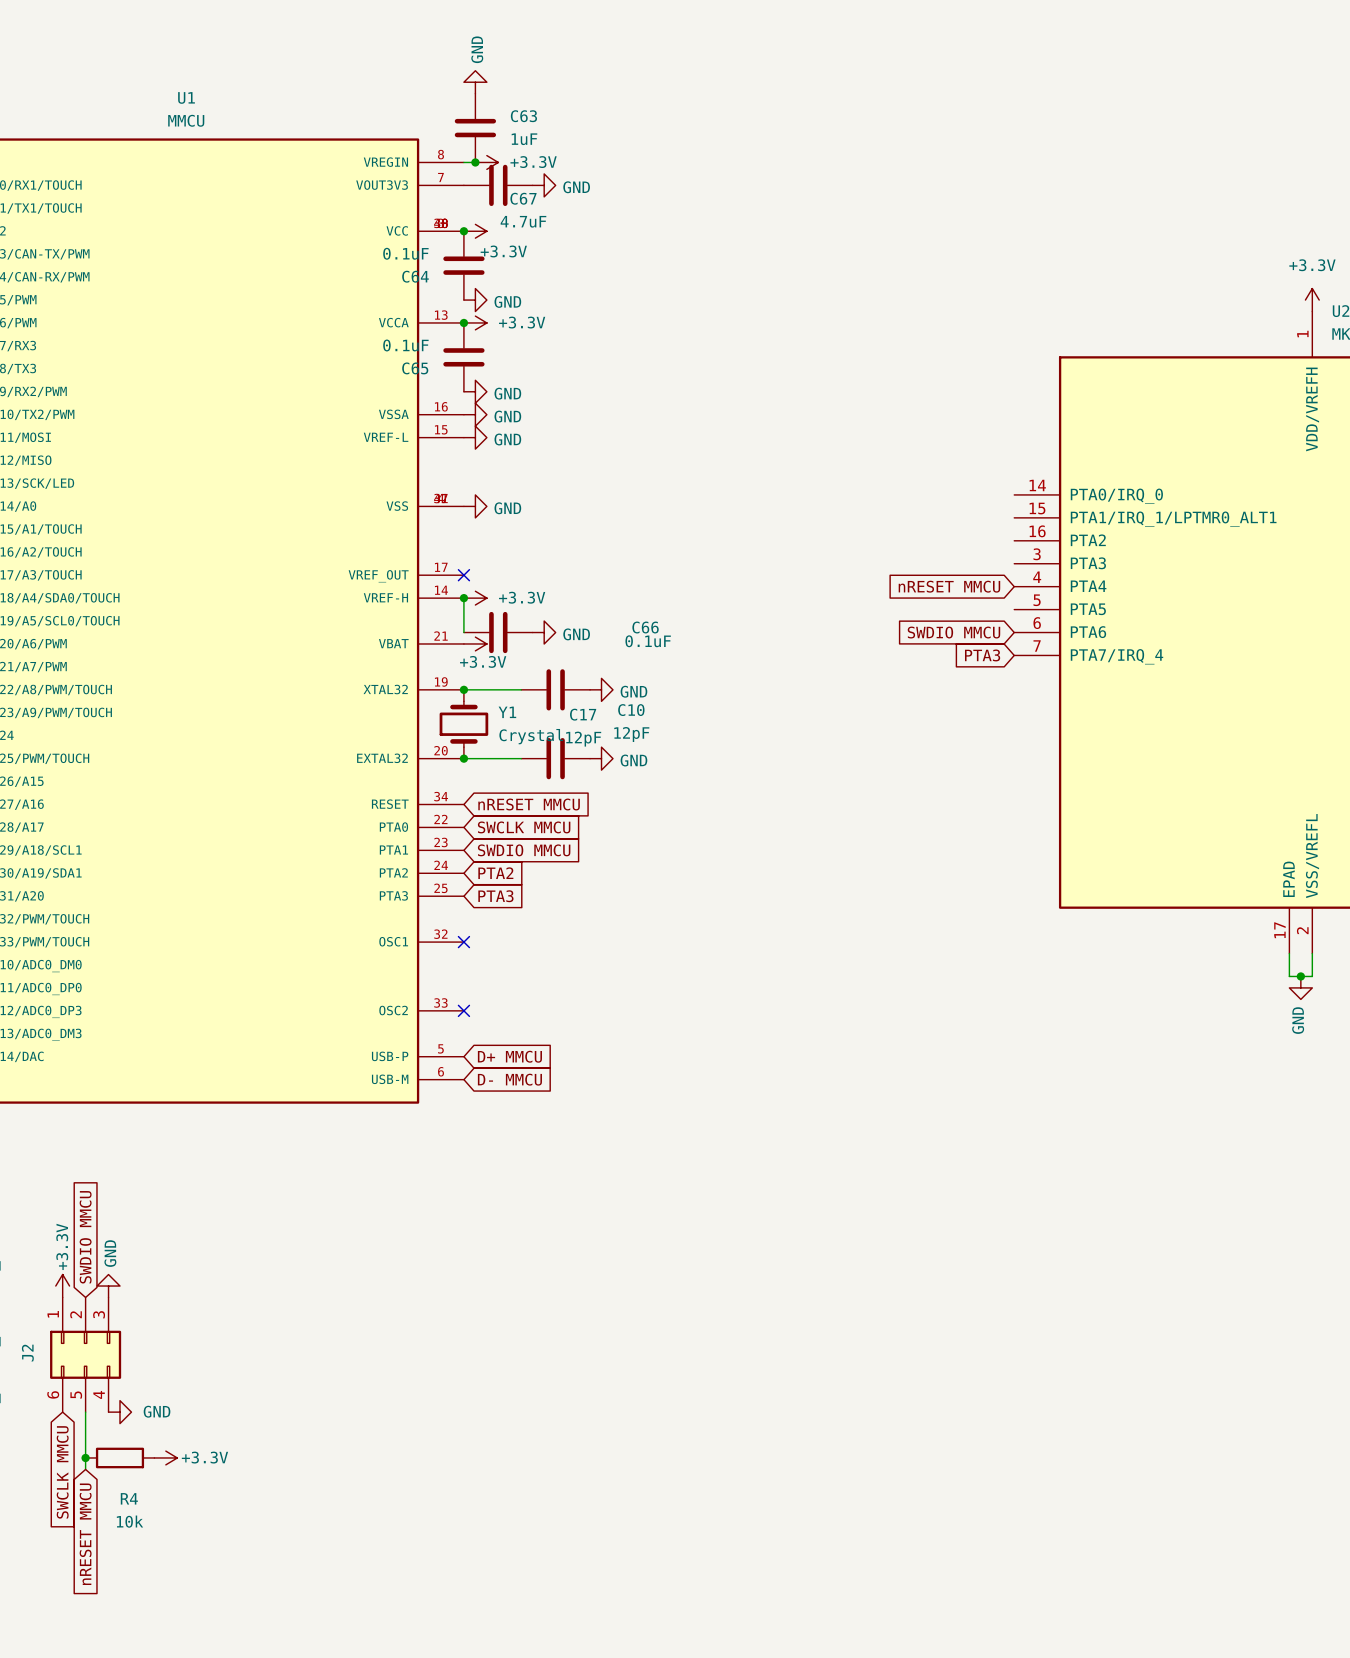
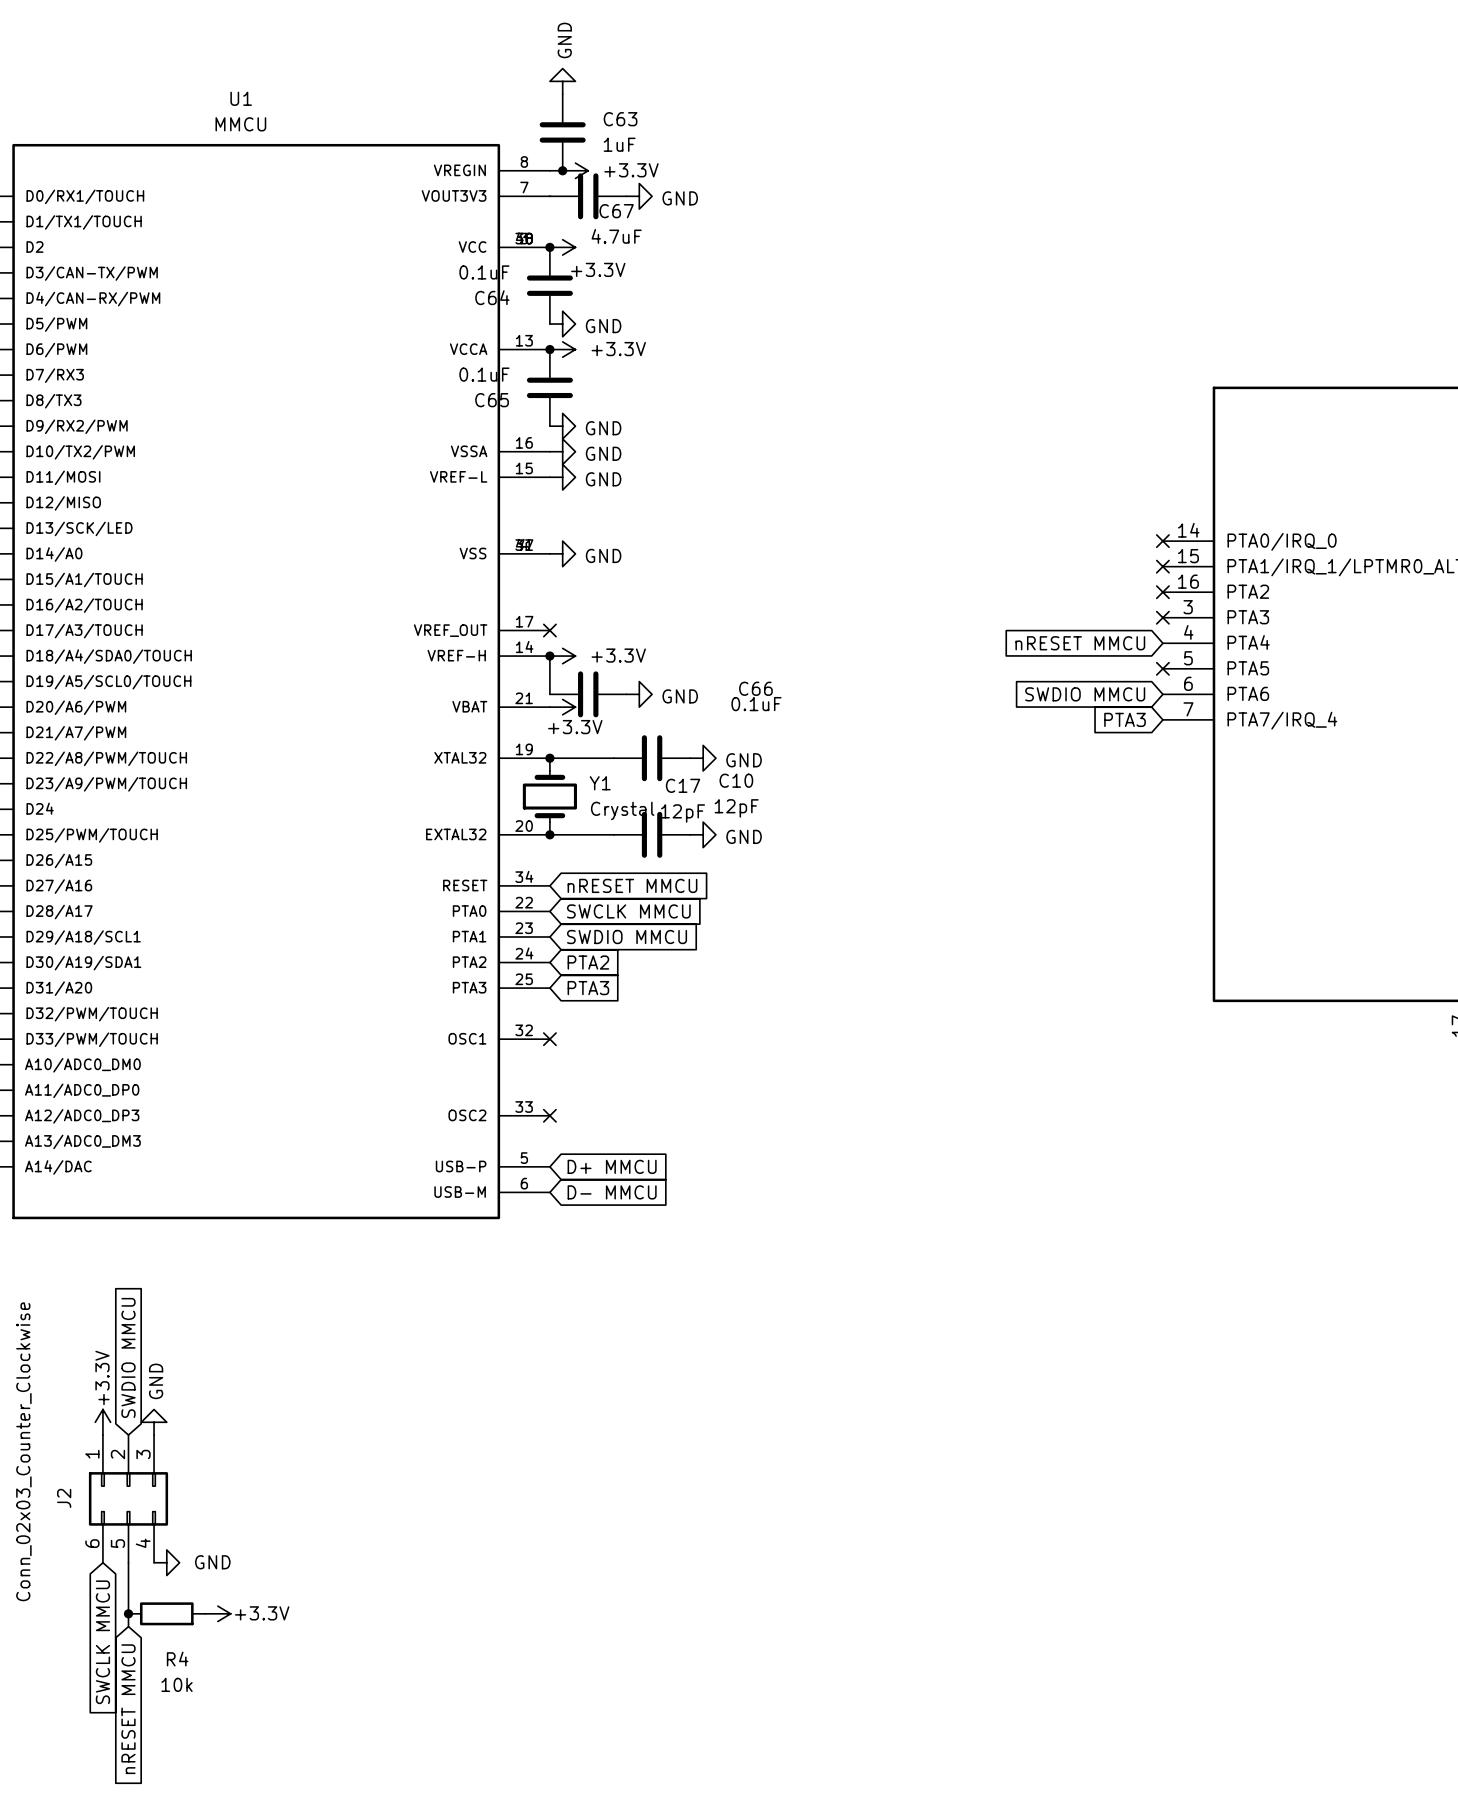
no-connect mark: none -> (1162, 541)
no-connect mark: none -> (1162, 566)
no-connect mark: none -> (1162, 592)
no-connect mark: none -> (1162, 617)
no-connect mark: none -> (1162, 668)

